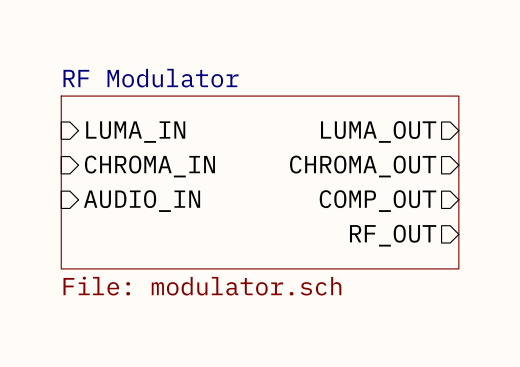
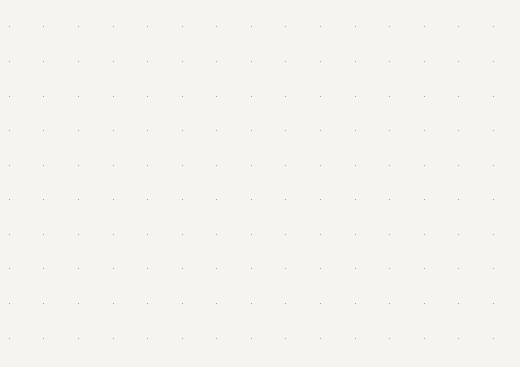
sheet pin: LUMA_OUT (378, 131) -> none
sheet pin: LUMA_IN (135, 132) -> none
sheet pin: CHROMA_IN (149, 166) -> none
sheet pin: CHROMA_OUT (363, 166) -> none
sheet RF Modulator: File: modulator.sch (260, 182) -> none
sheet pin: AUDIO_IN (142, 201) -> none
sheet pin: COMP_OUT (378, 201) -> none
sheet pin: RF_OUT (393, 235) -> none

